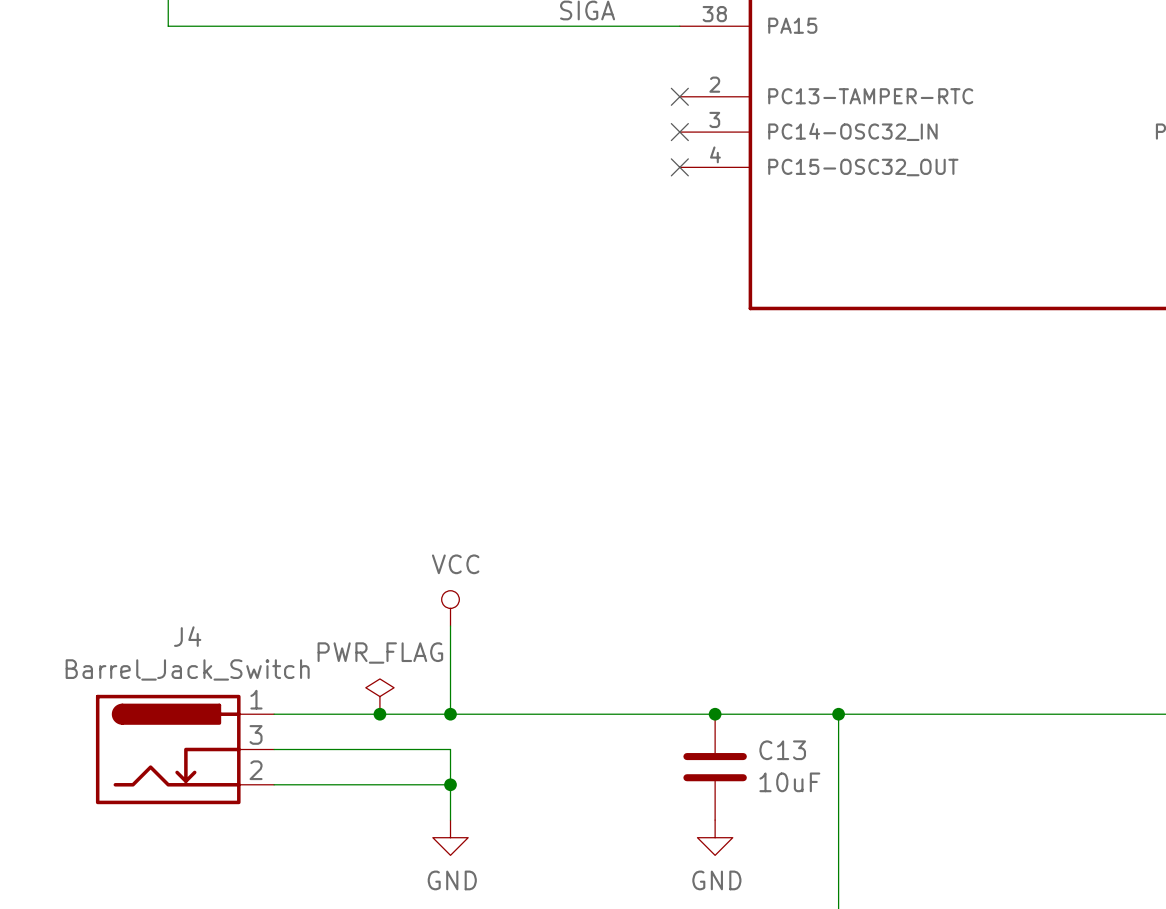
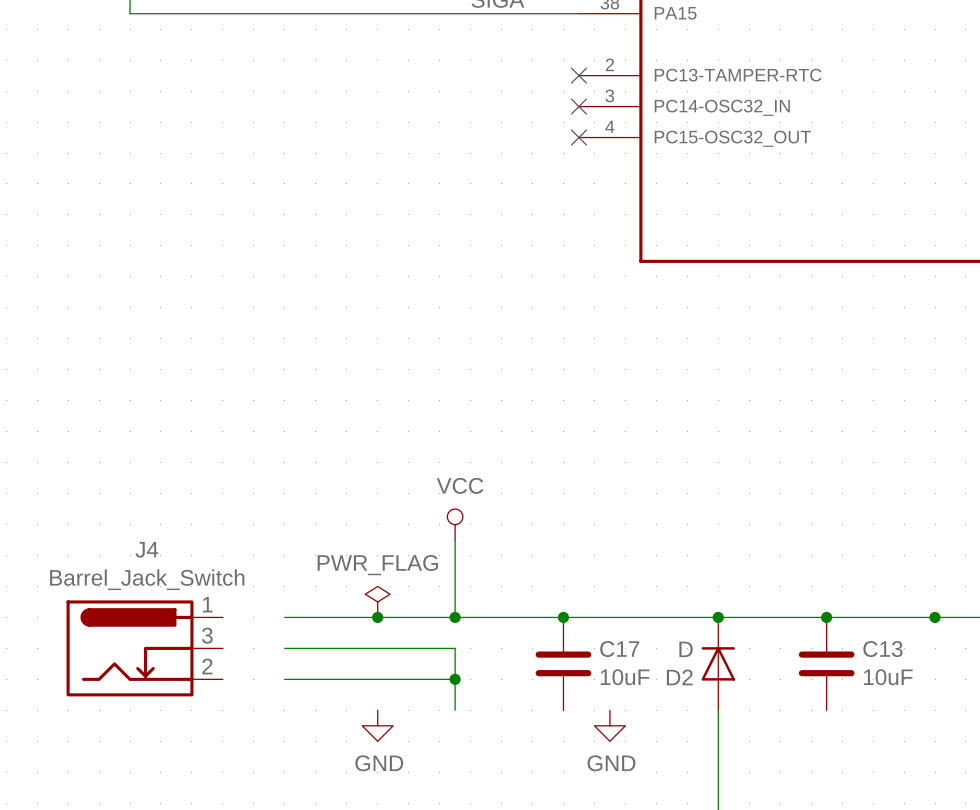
power symbol position: VCC (450, 608) -> VCC (455, 524)
wire: (450, 626) (450, 714) -> (455, 540) (455, 617)
power symbol position: PWR_FLAG (379, 696) -> PWR_FLAG (377, 601)
wire: (274, 714) (344, 714) -> none
junction: (379, 714) -> none
junction: none -> (455, 617)
junction position: (715, 714) -> (563, 617)
junction: none -> (826, 617)
junction: none -> (935, 617)
wire: (274, 749) (344, 749) -> none
wire: (450, 749) (450, 820) -> (377, 648) (455, 648) (455, 710)
C17: none -> 10uF (563, 663)
C13 position: (715, 767) -> (826, 663)
D2: none -> D (718, 663)
wire: (274, 784) (344, 784) -> none
wire: none -> (377, 679) (455, 679)
junction: (450, 784) -> none
junction: none -> (455, 679)

